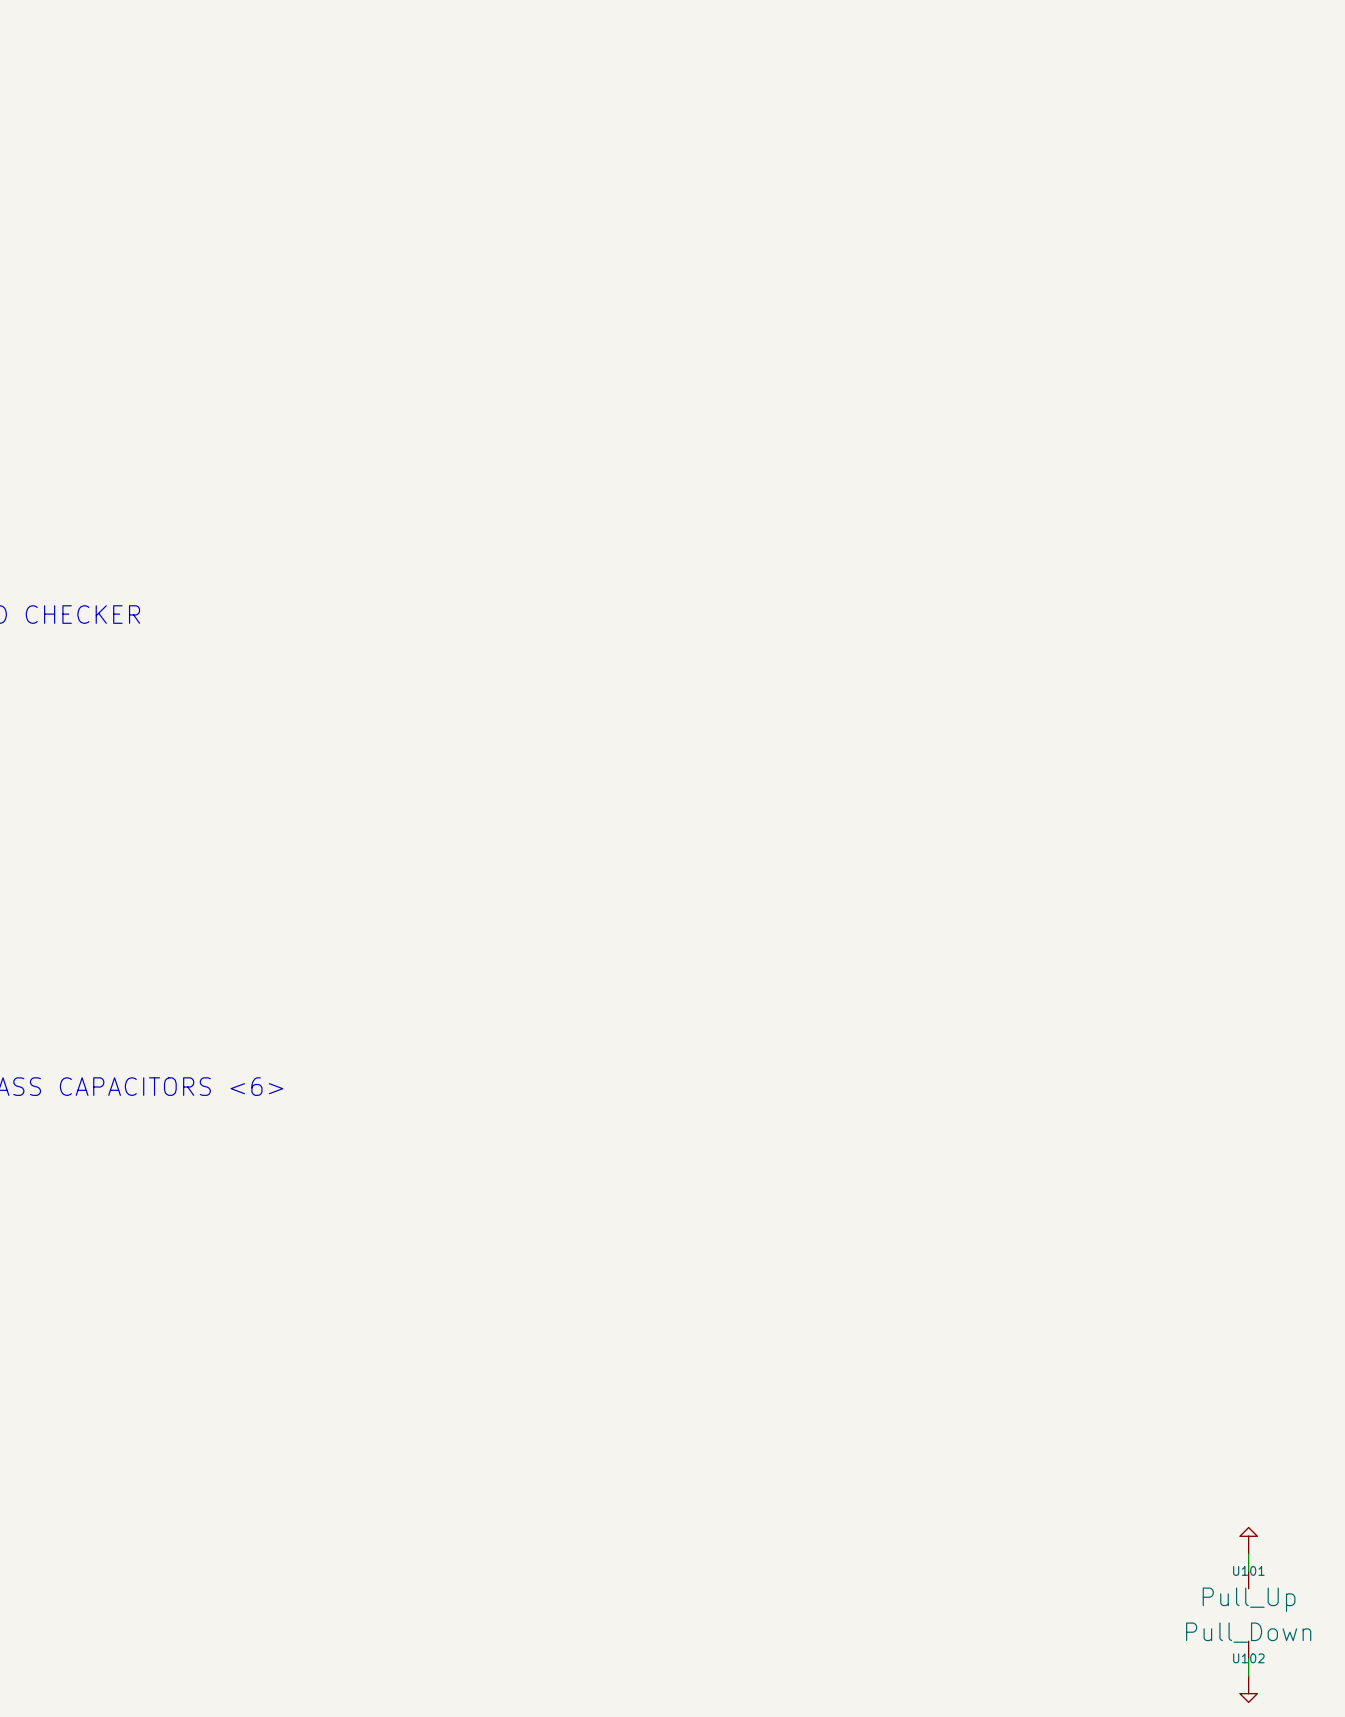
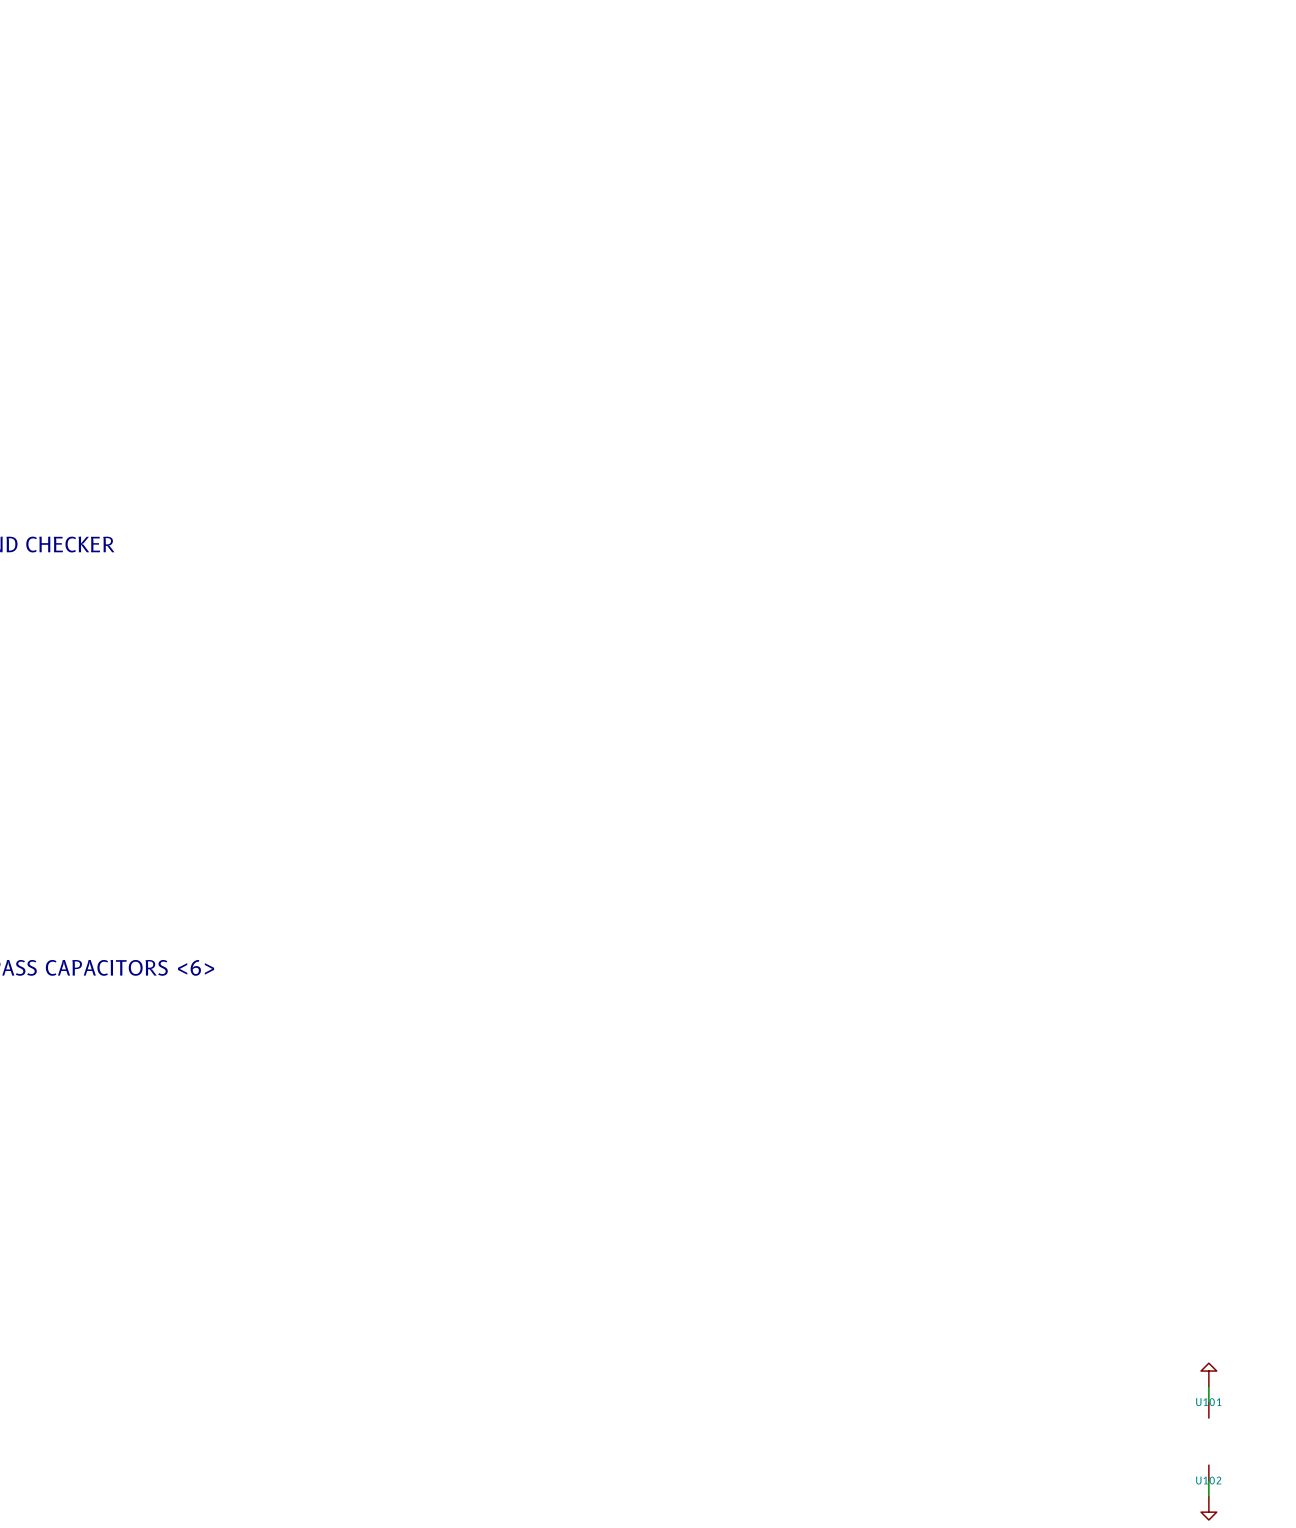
U101 value: Pull_Up (1249, 1599) -> none
U102 value: Pull_Down (1248, 1632) -> none

